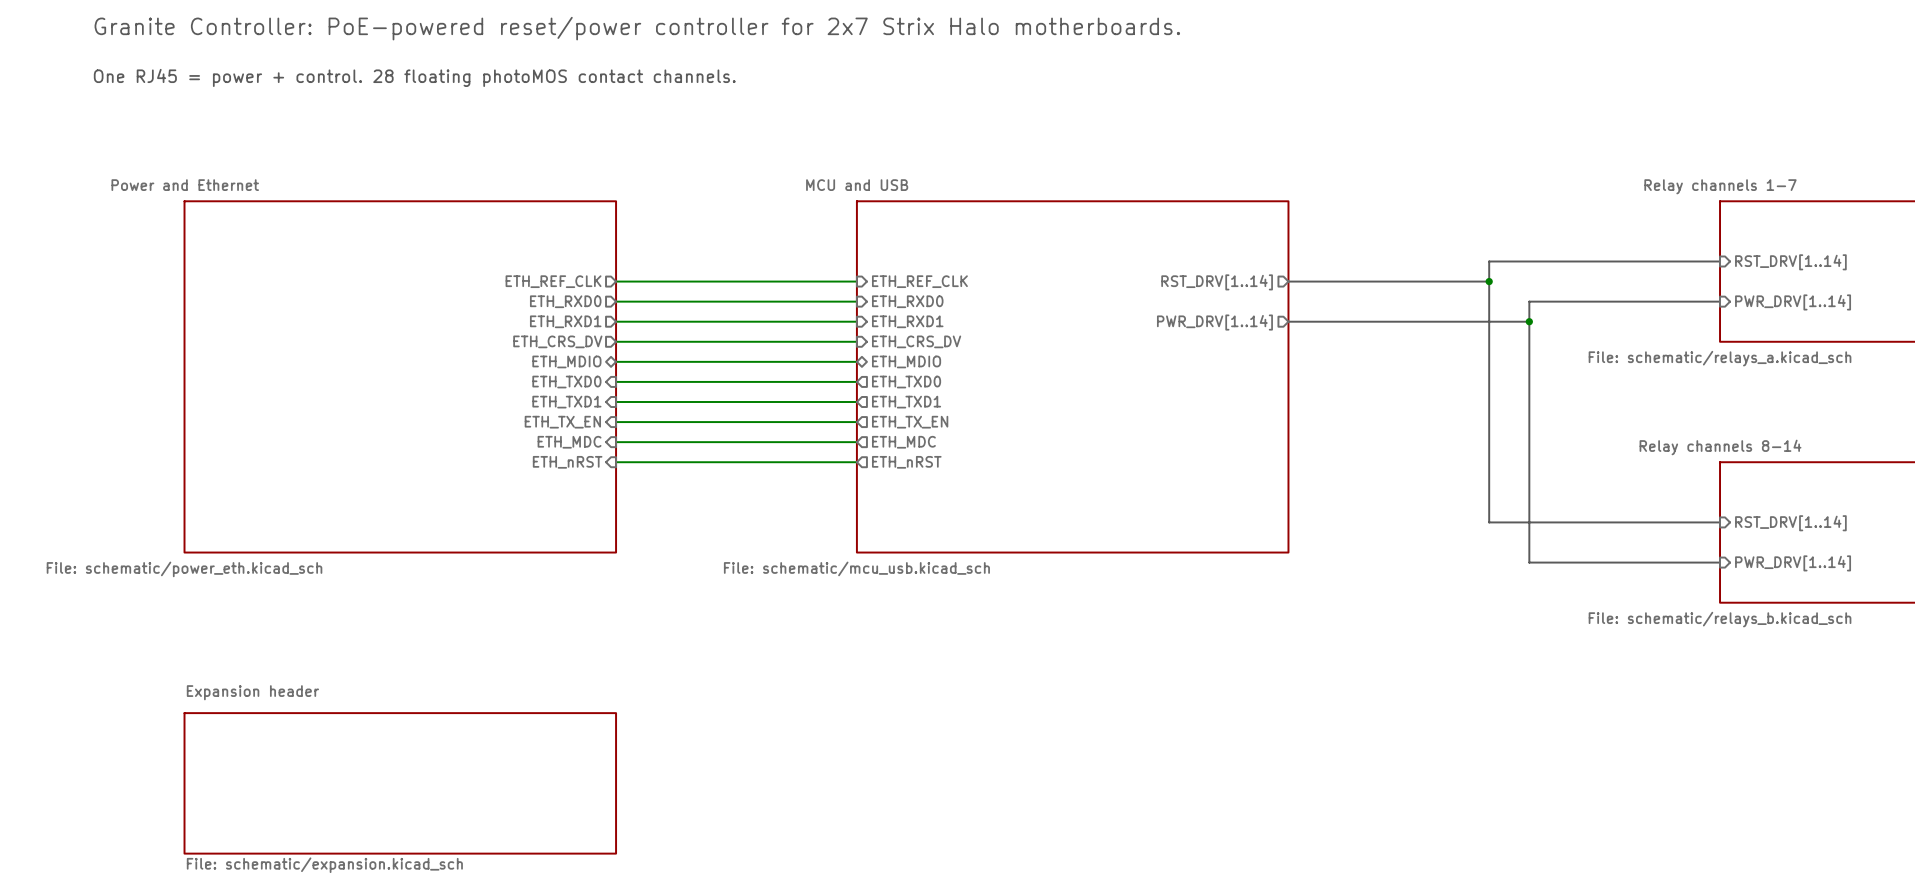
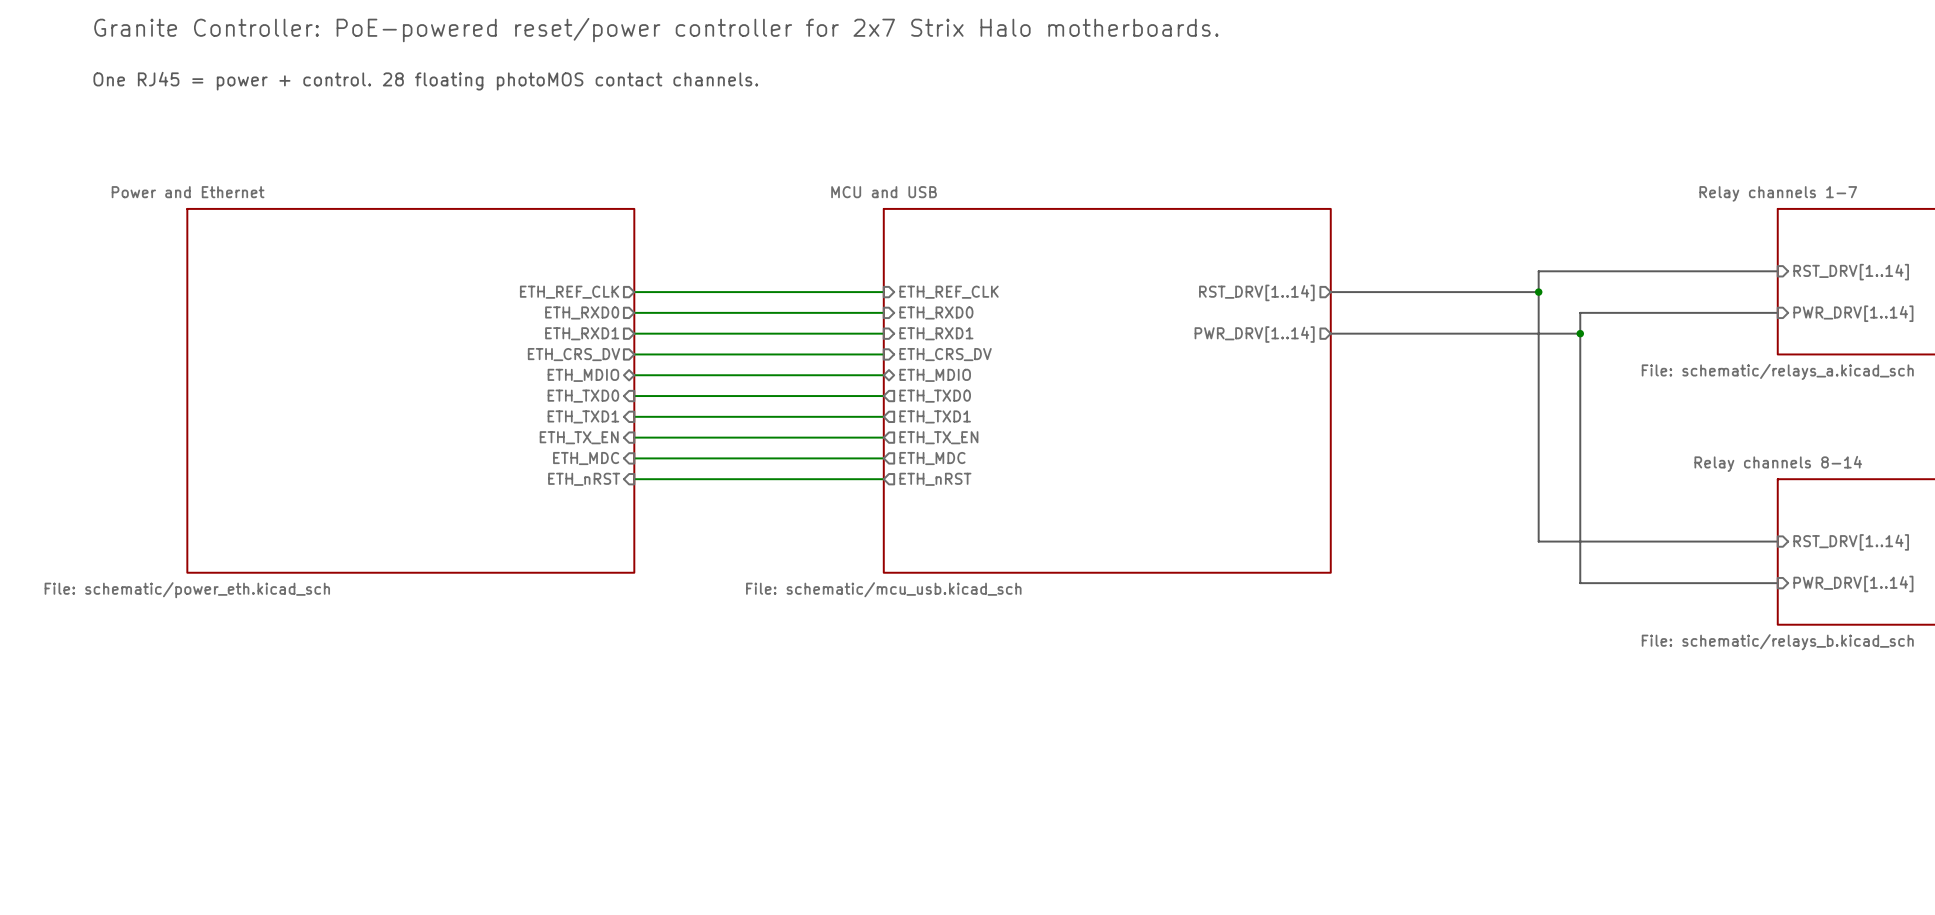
sheet Expansion header: File: schematic/expansion.kicad_sch (400, 783) -> none

